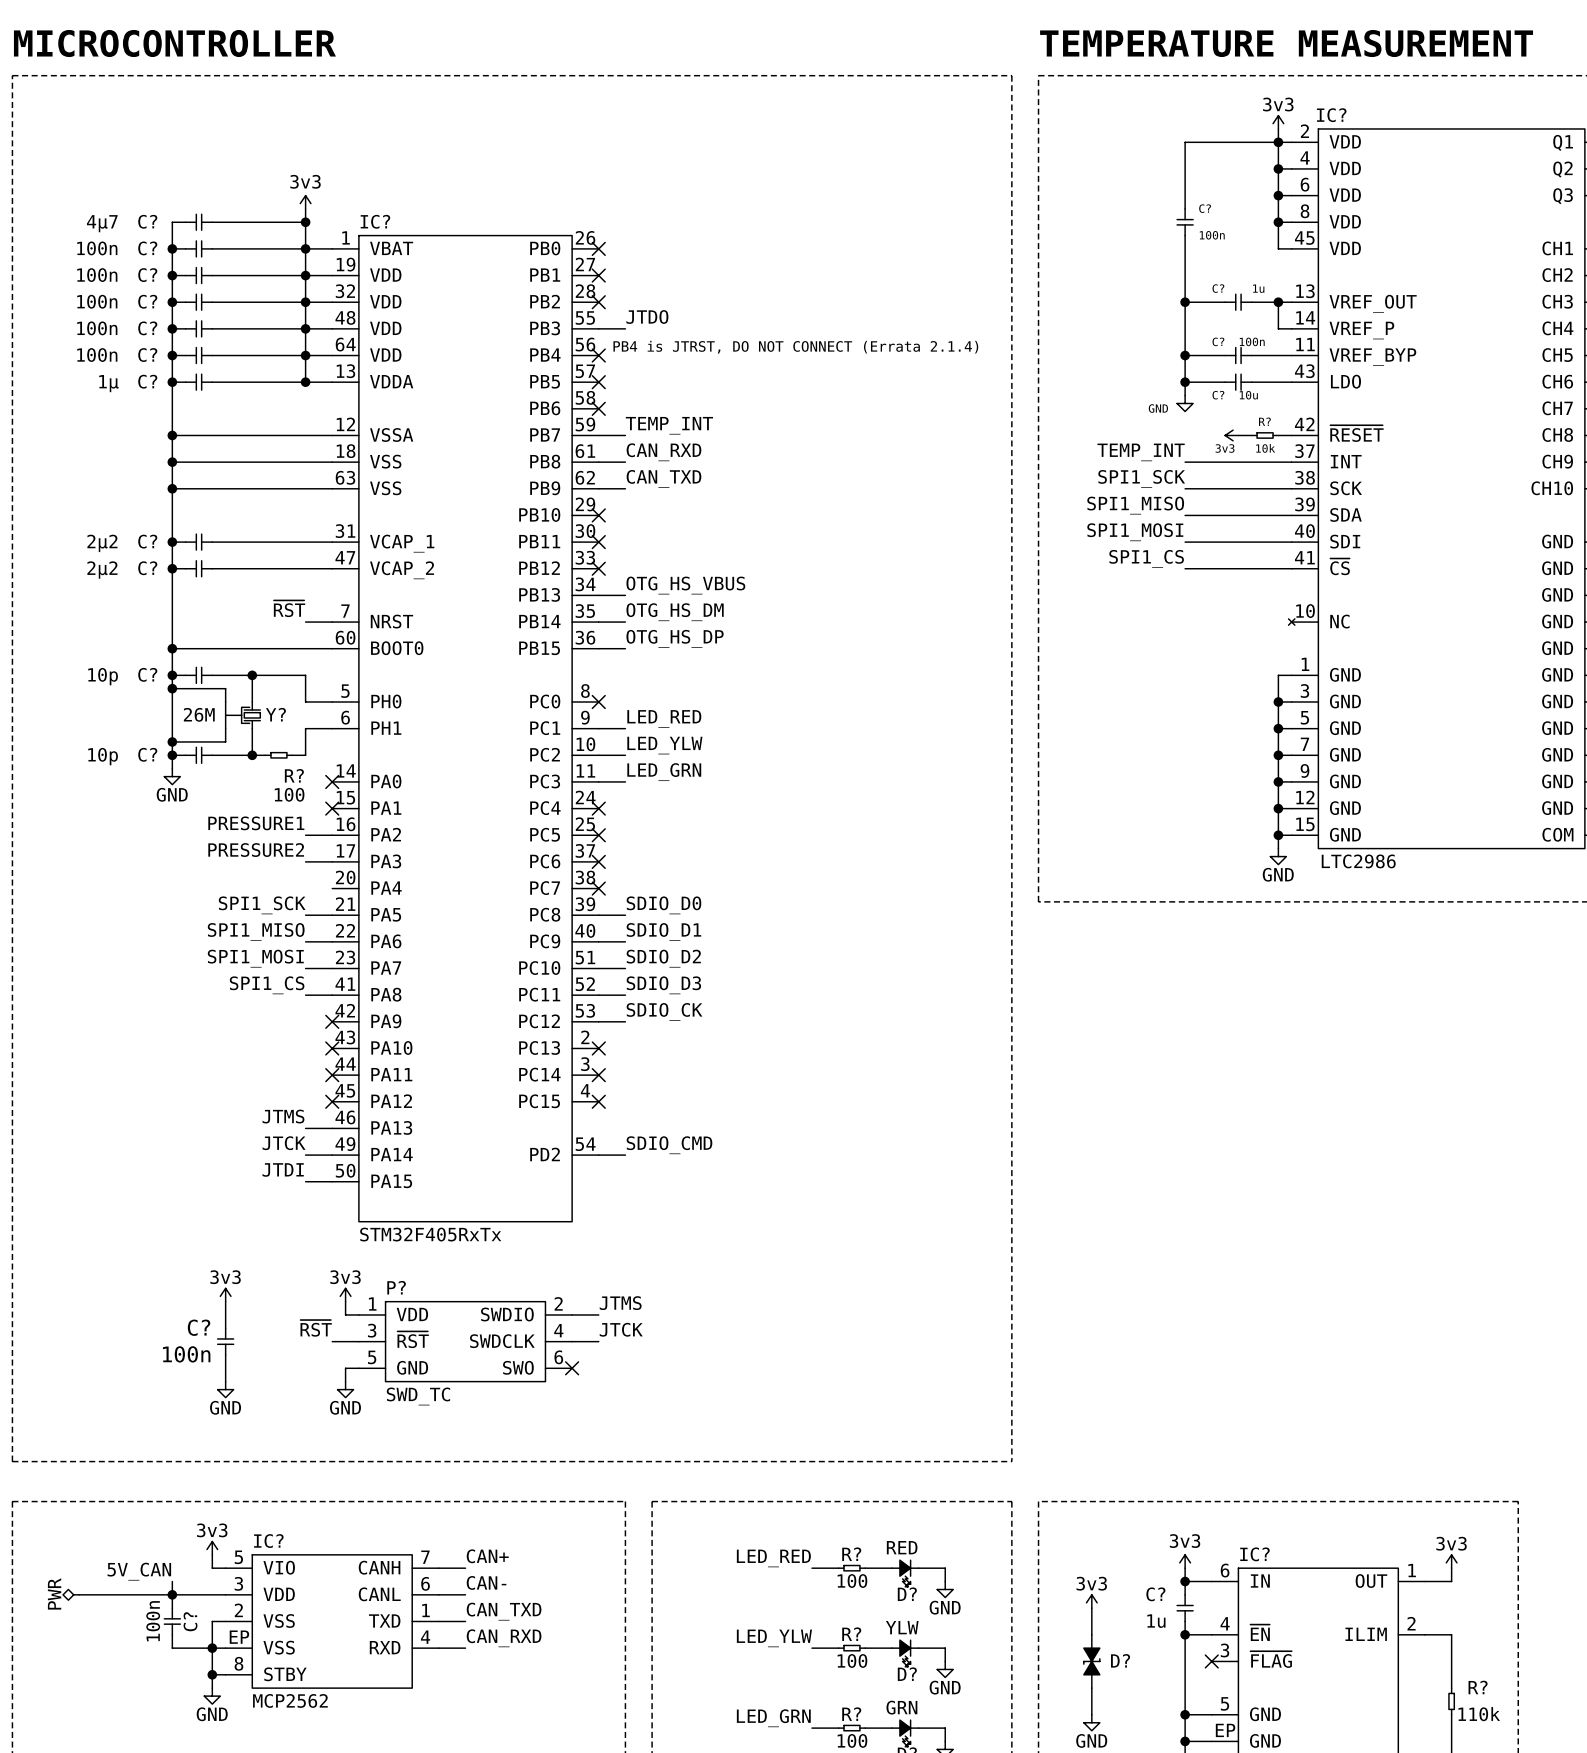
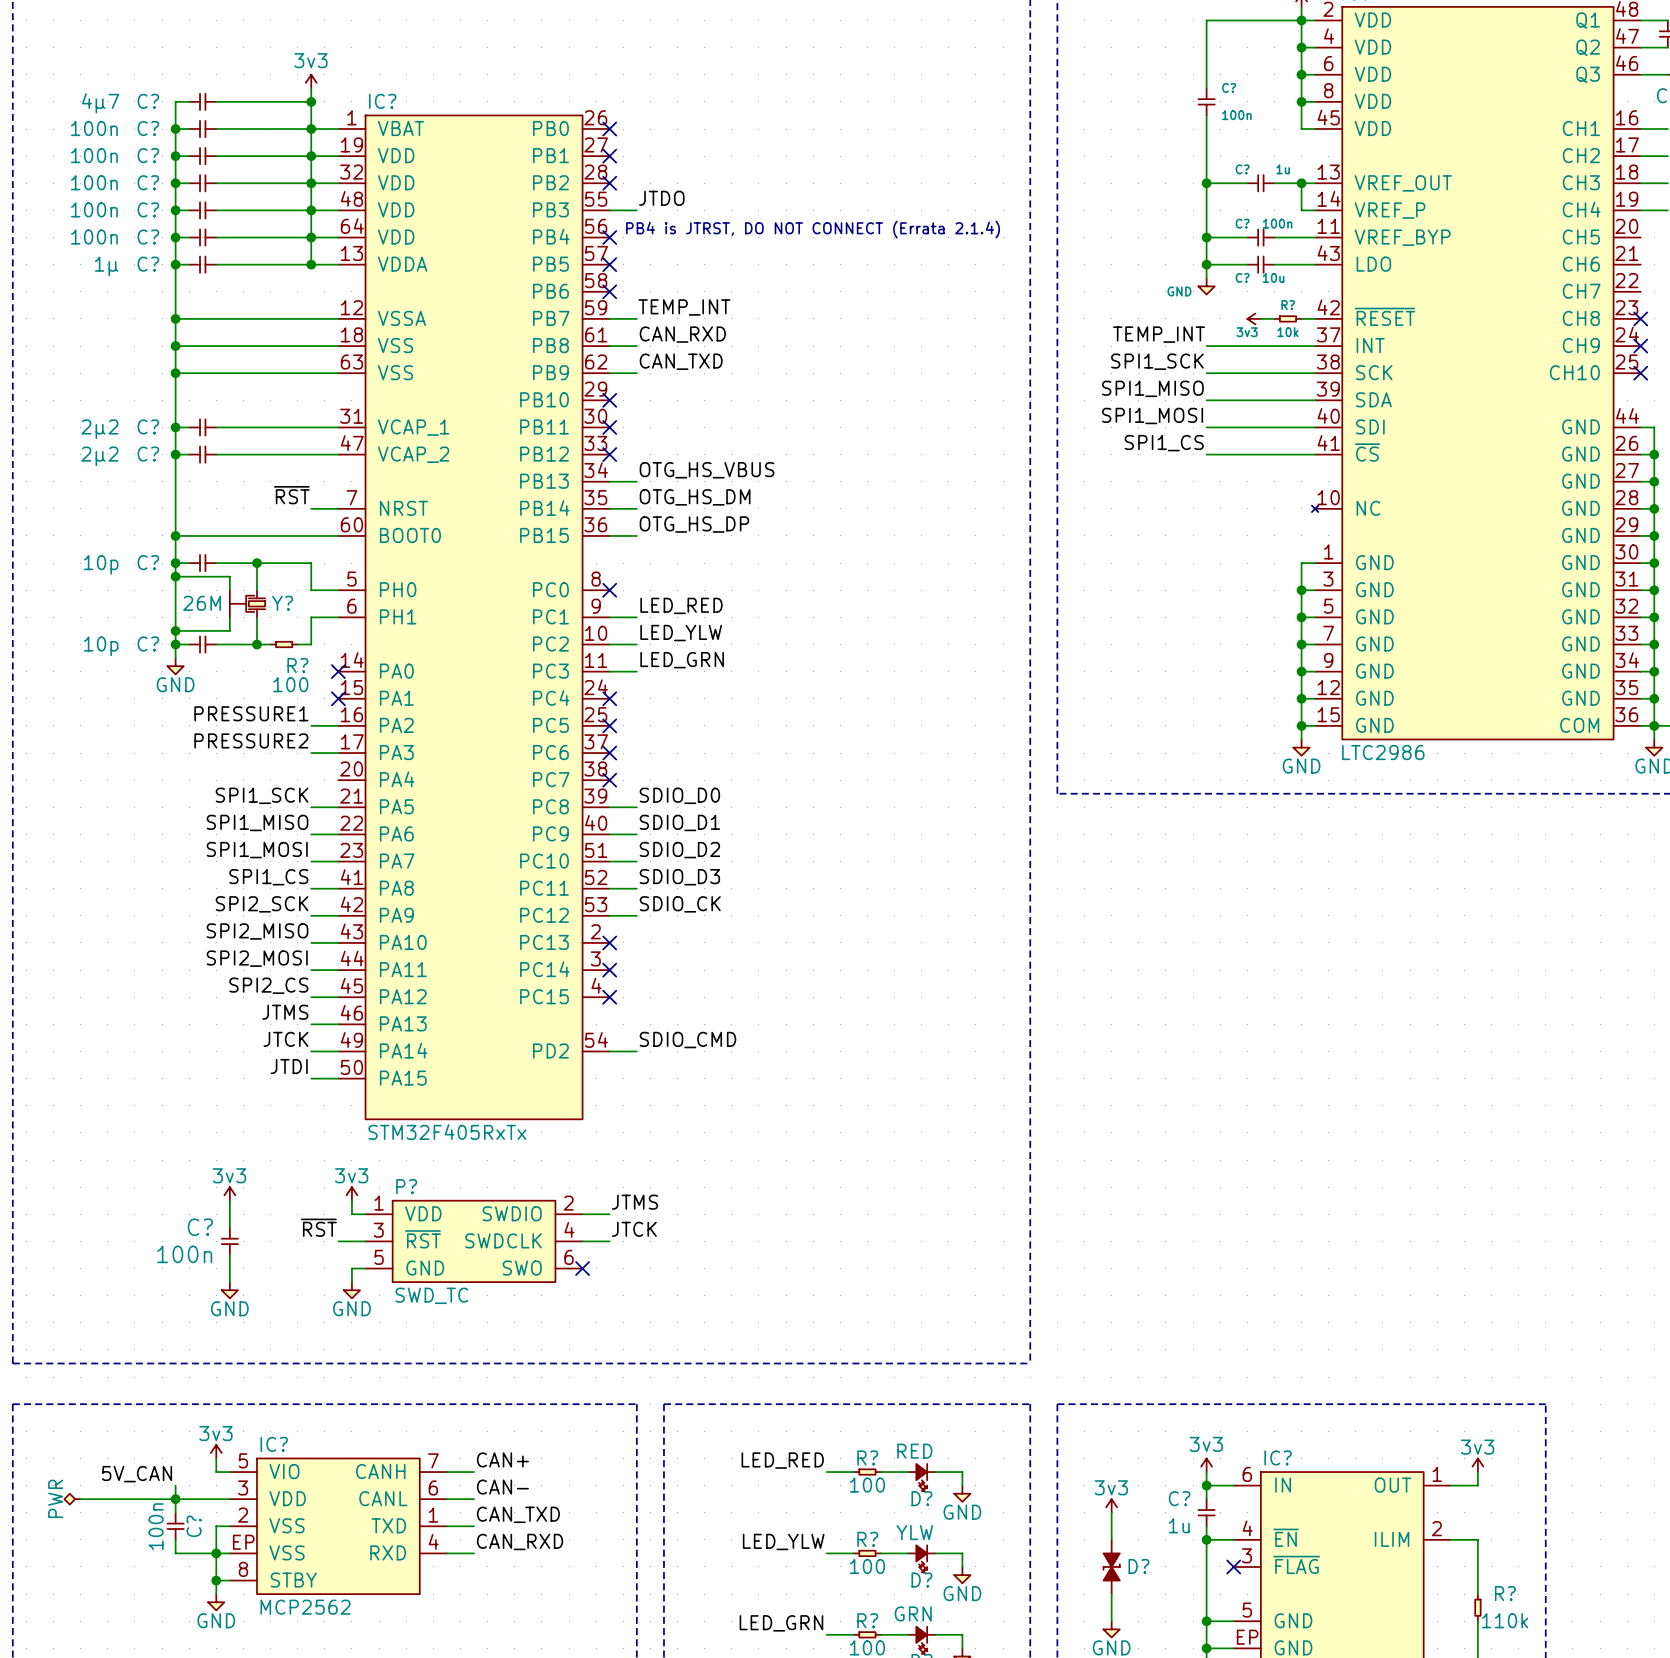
label: none -> SPI2_SCK (262, 904)
wire: none -> (311, 915) (338, 915)
no-connect mark: (332, 1021) -> none
label: none -> SPI2_MISO (257, 931)
wire: none -> (311, 942) (338, 942)
no-connect mark: (332, 1048) -> none
label: none -> SPI2_MOSI (257, 958)
wire: none -> (311, 970) (338, 970)
no-connect mark: (332, 1075) -> none
label: none -> SPI2_CS (268, 985)
wire: none -> (311, 997) (338, 997)
no-connect mark: (332, 1101) -> none

